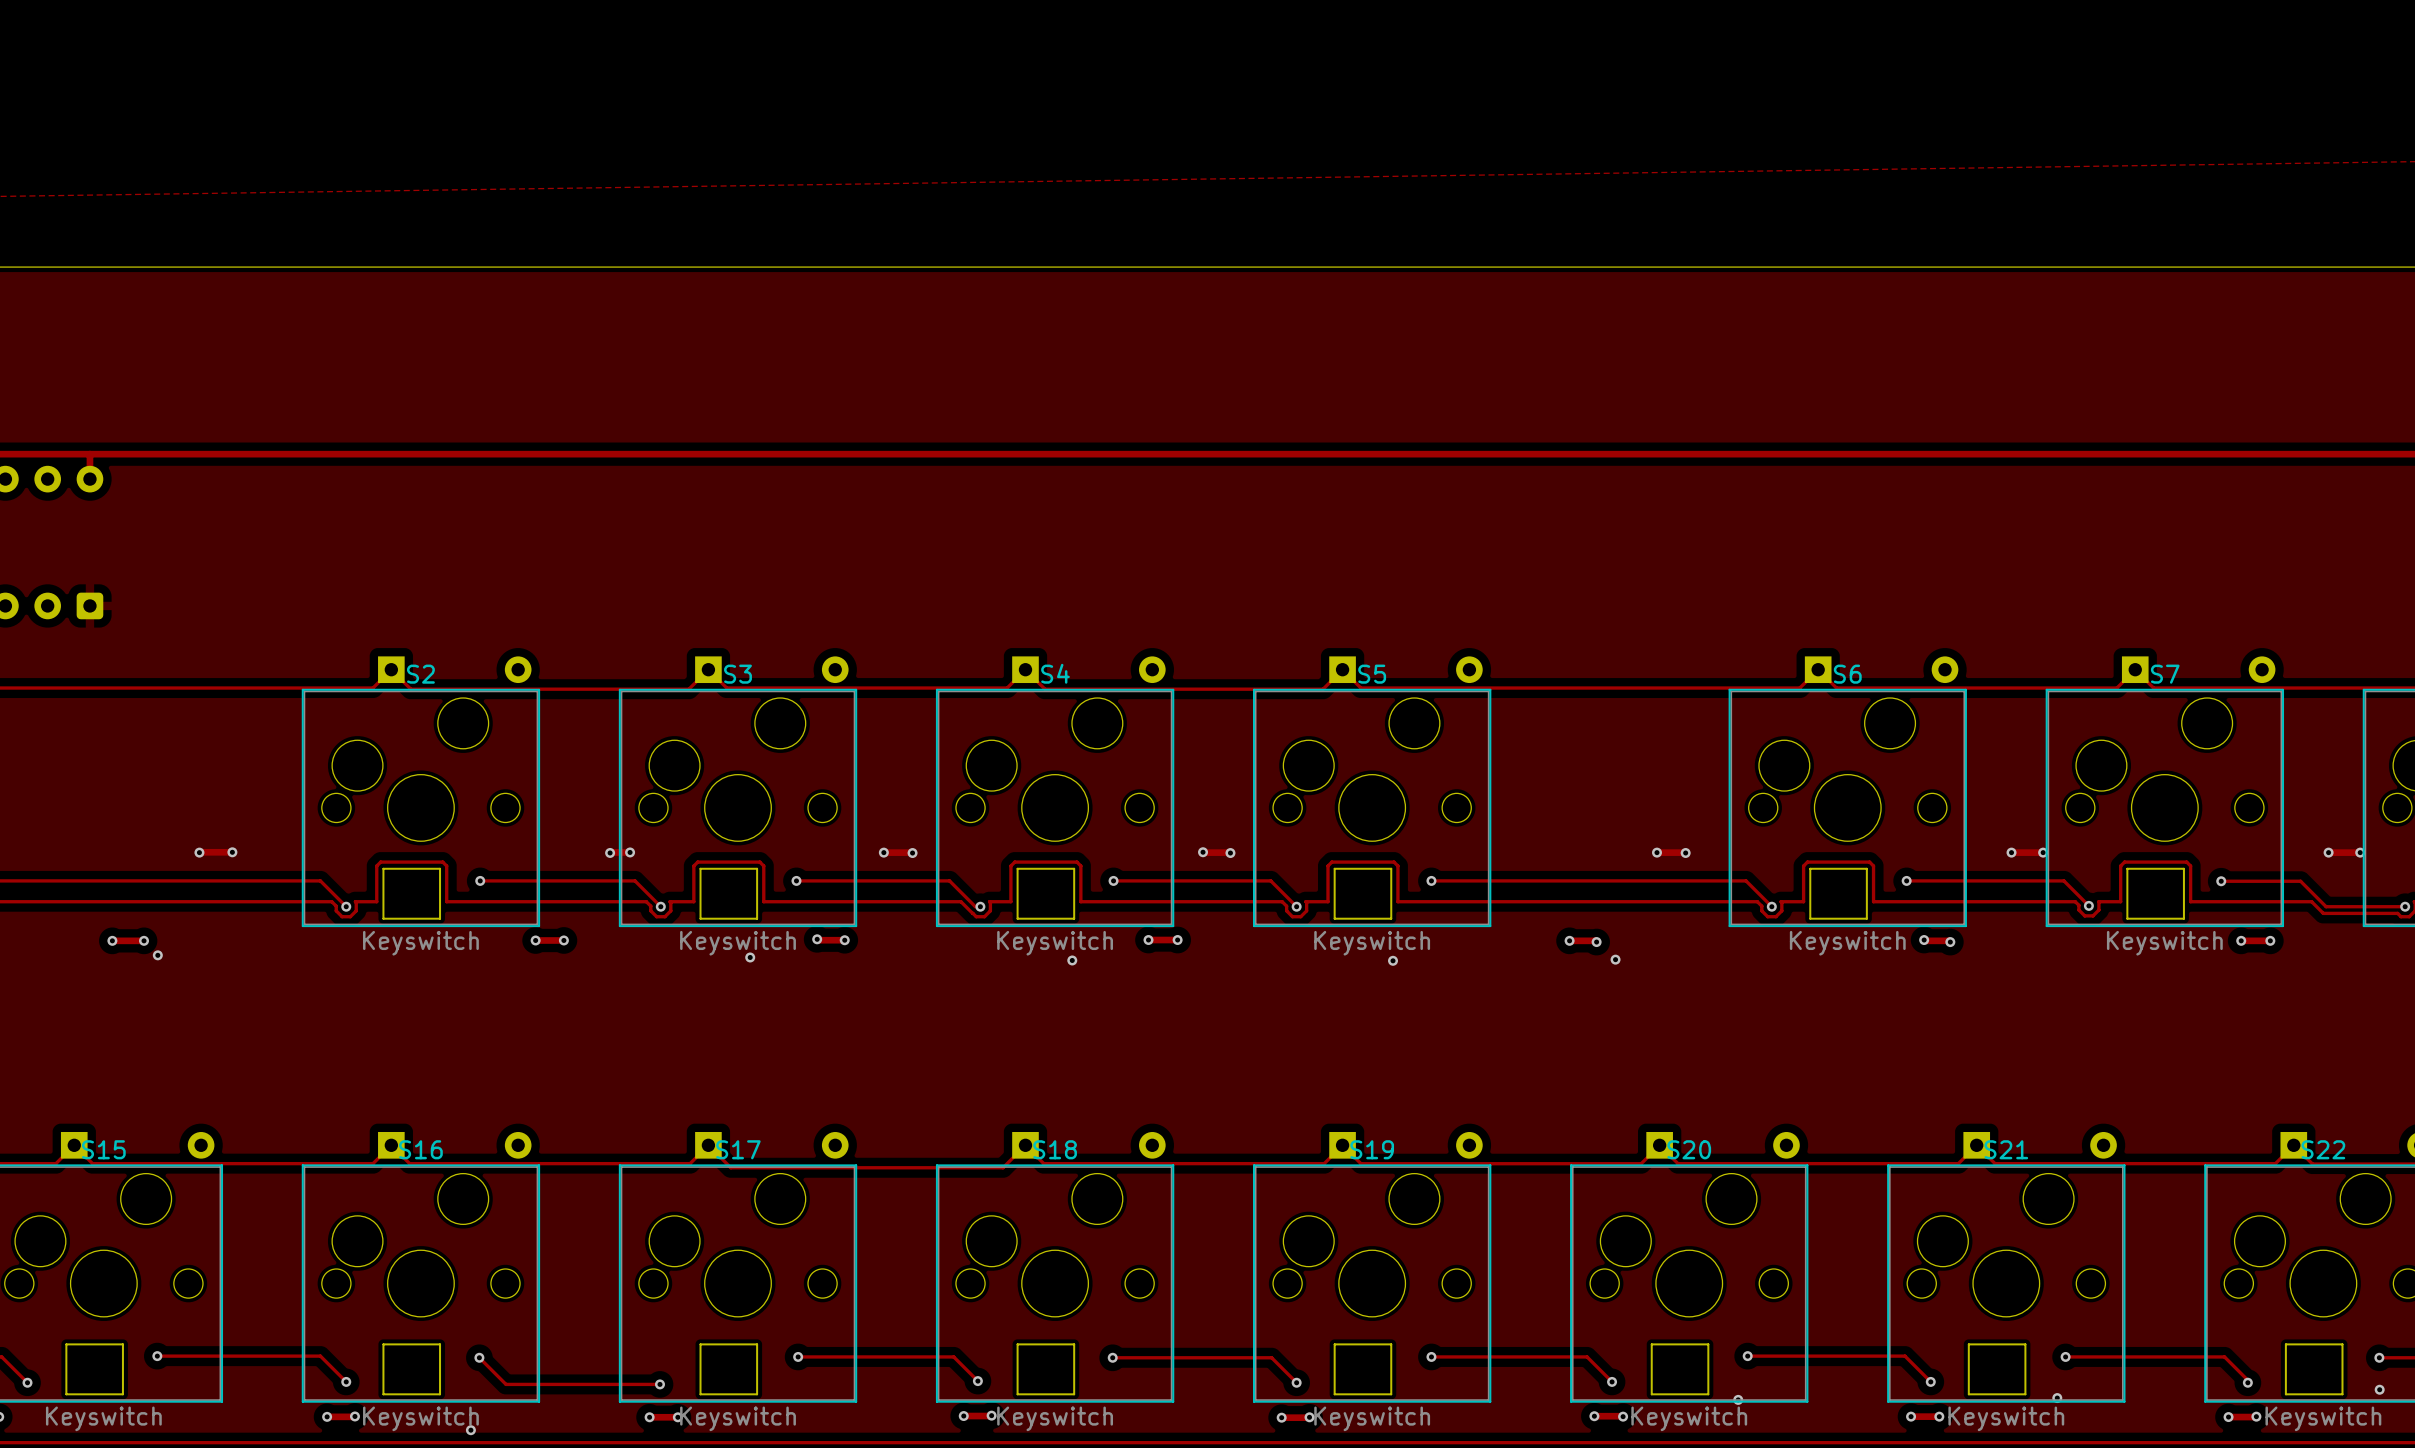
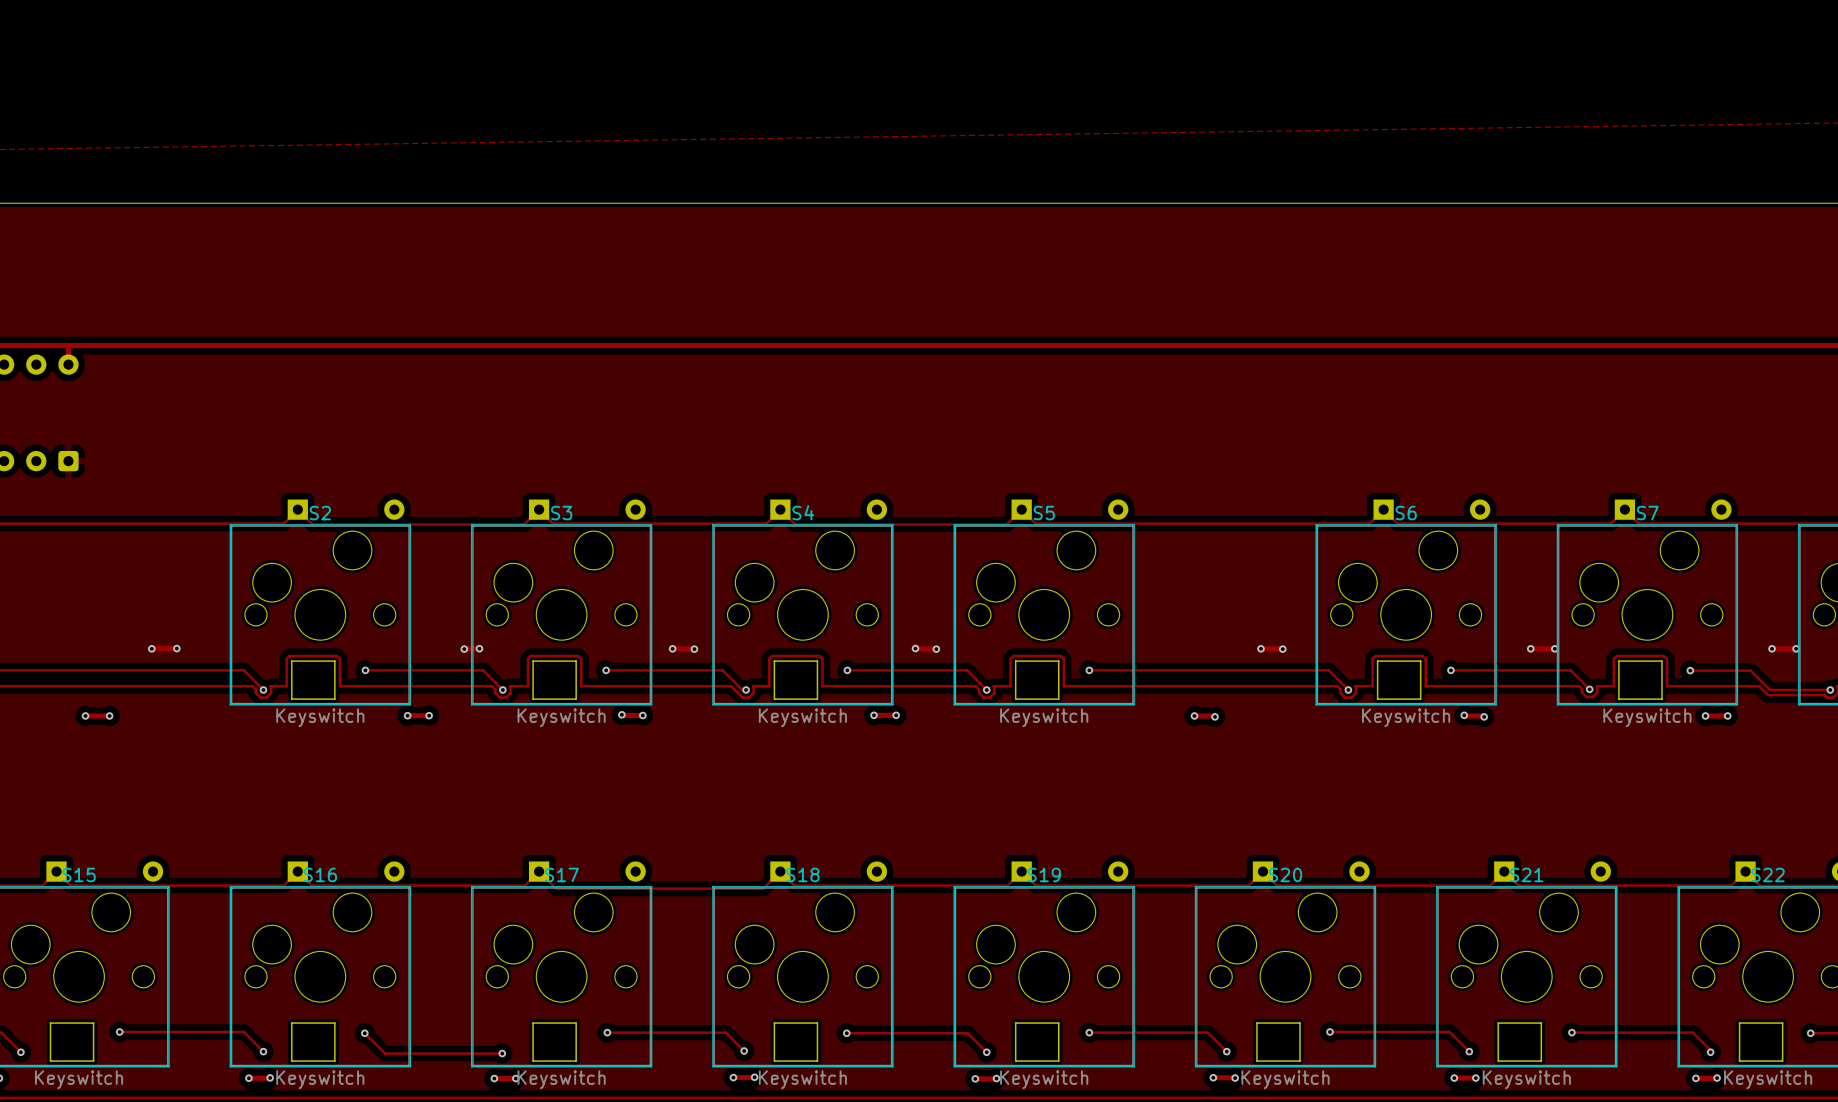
via: (157, 955) -> none
via: (750, 957) -> none
via: (1615, 959) -> none
via: (1072, 960) -> none
via: (1393, 960) -> none
via: (2379, 1389) -> none
via: (2057, 1398) -> none
via: (1738, 1399) -> none
via: (470, 1430) -> none

